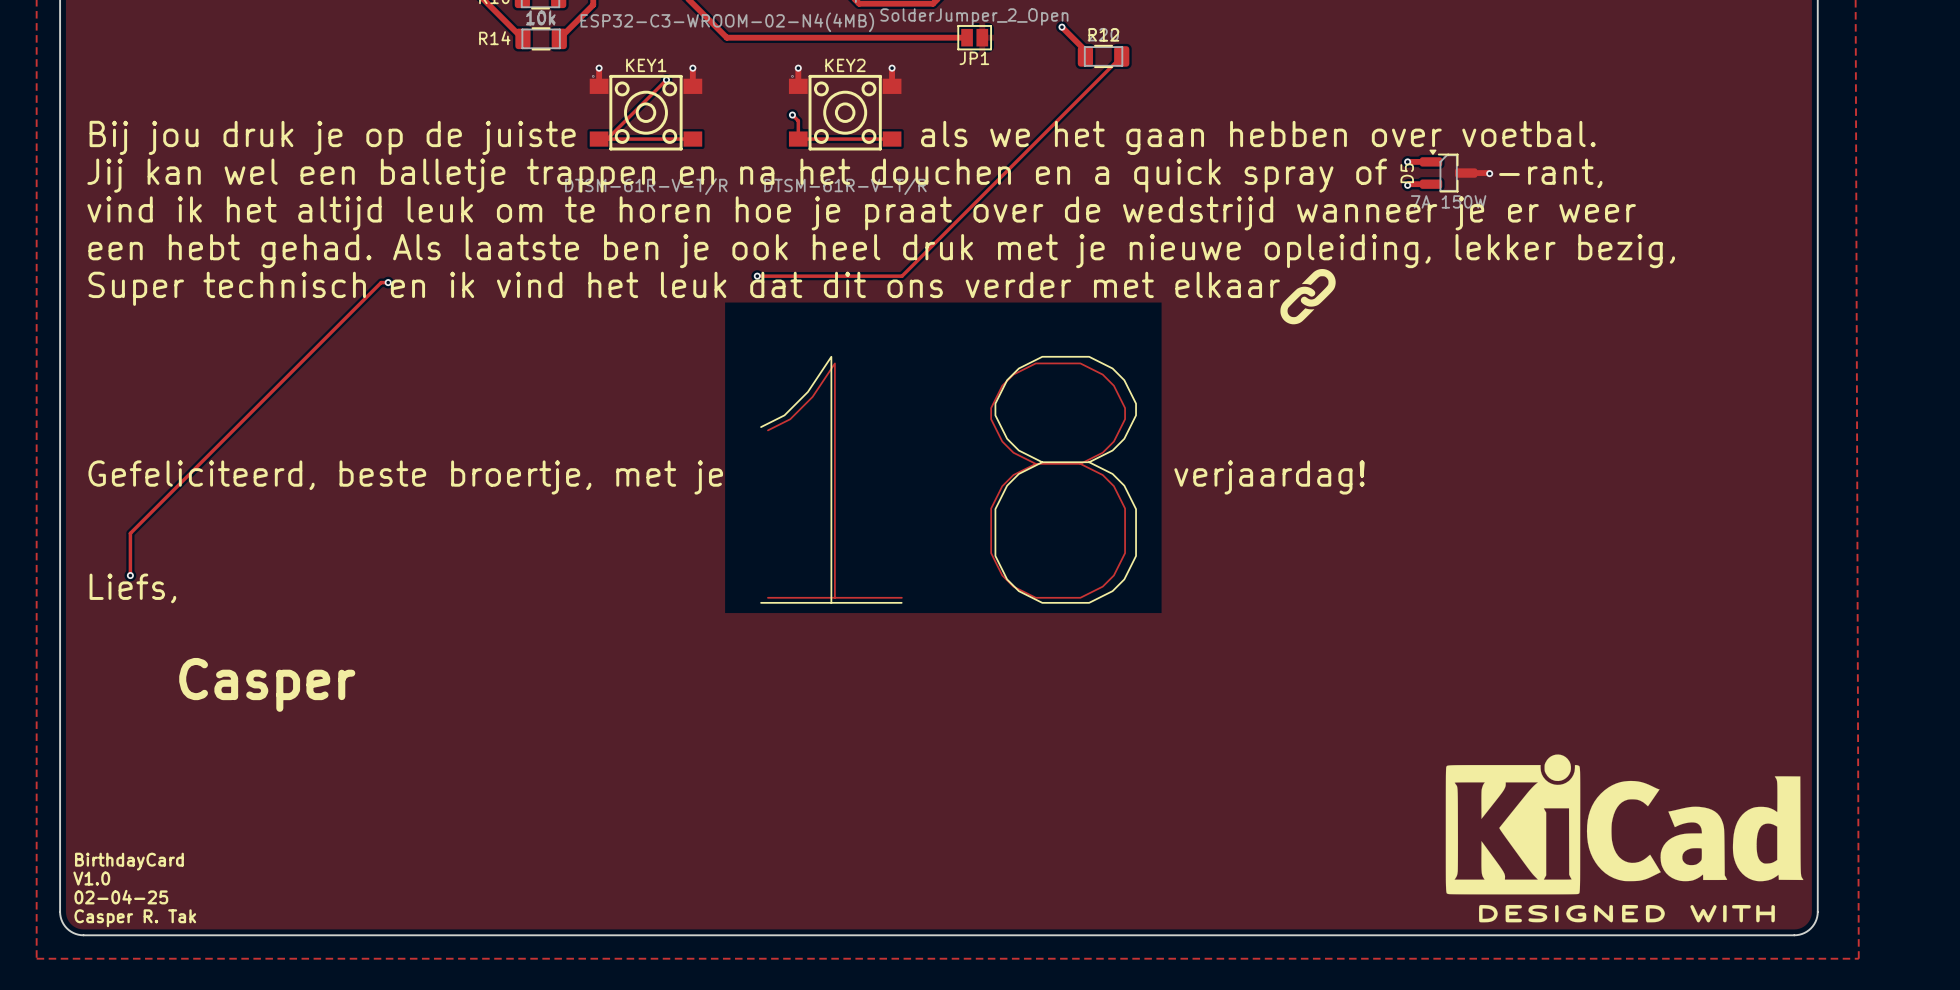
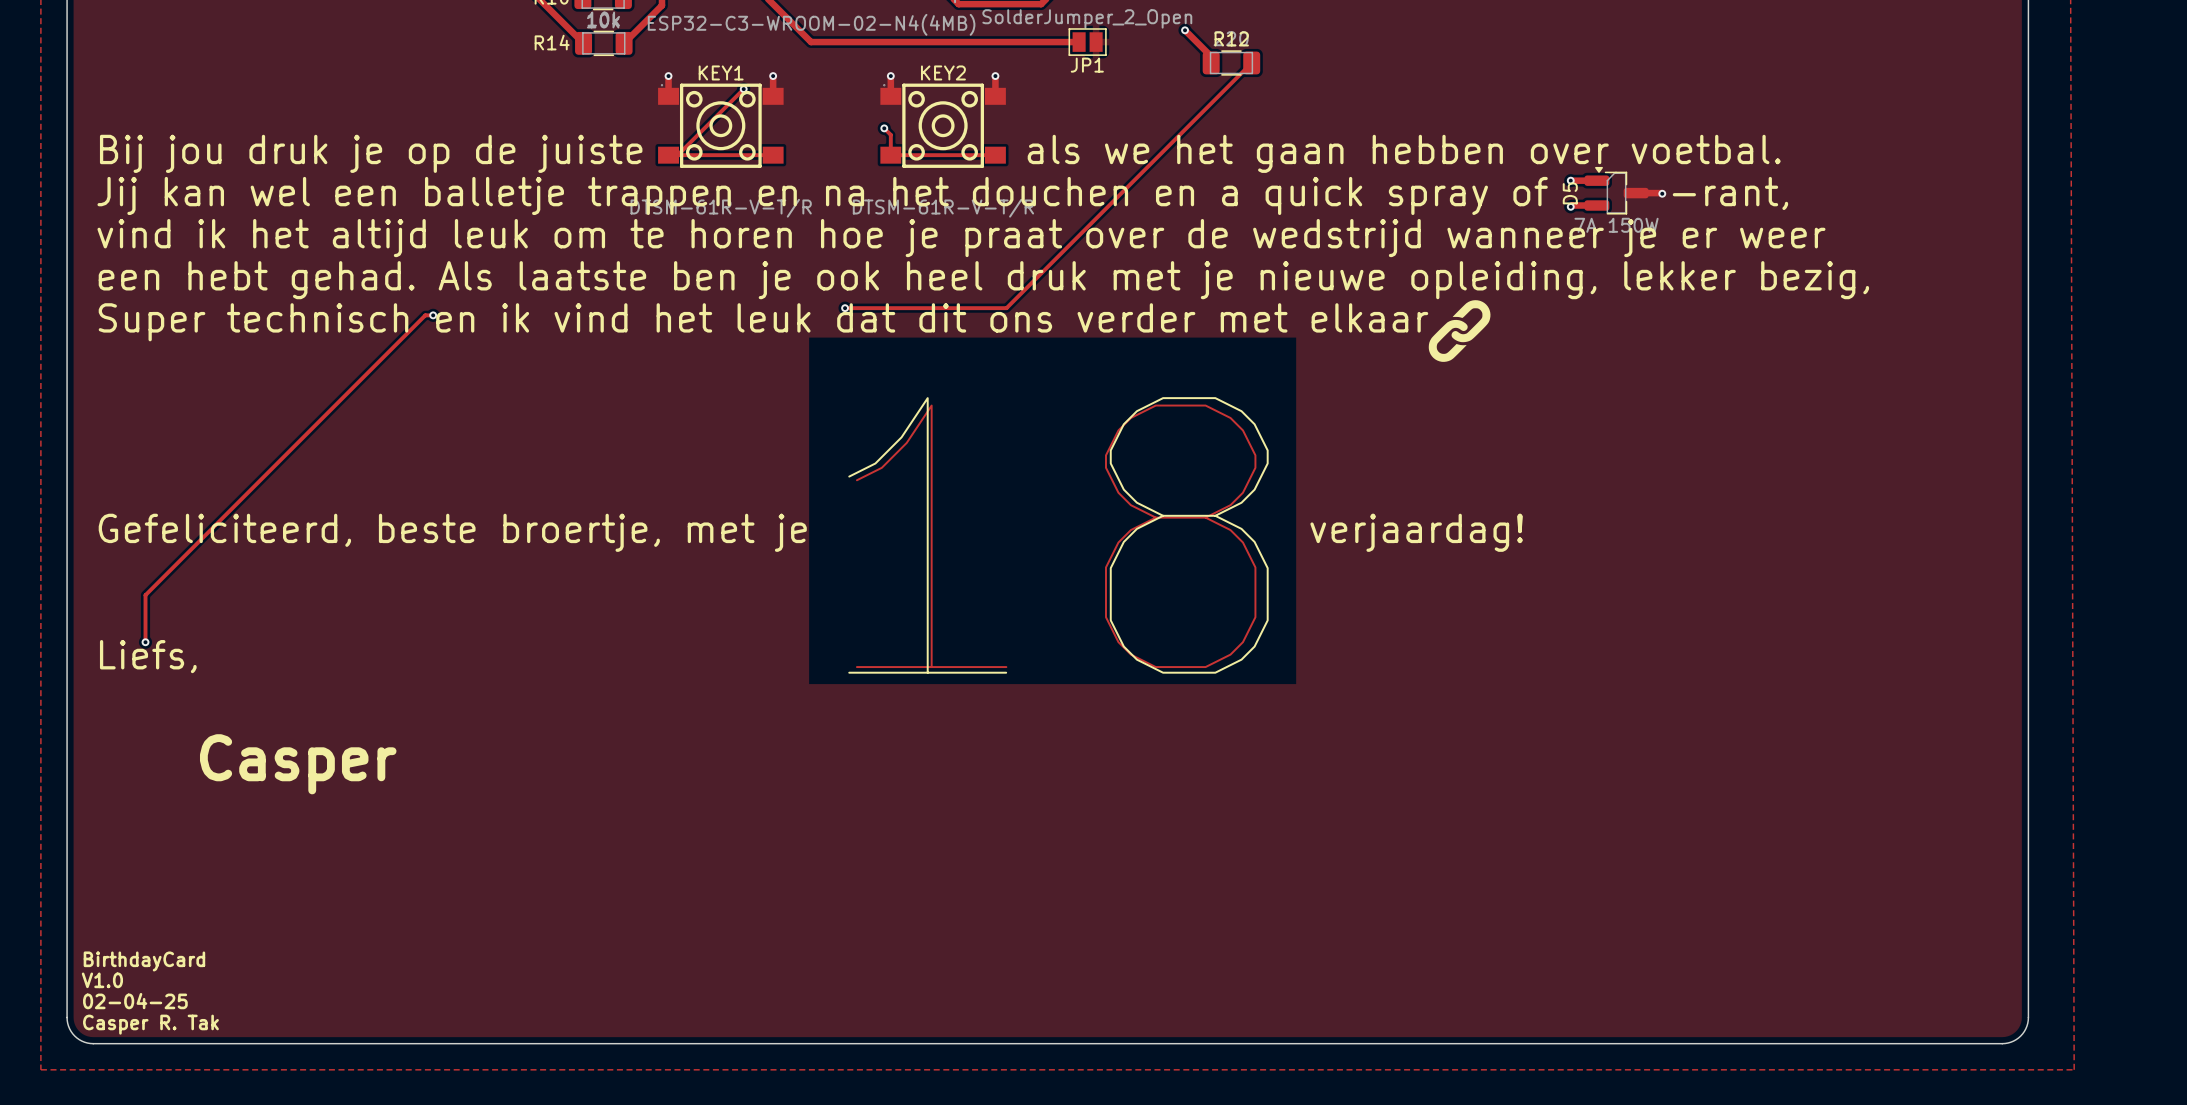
drawing: [1445, 754, 1804, 923] -> none

